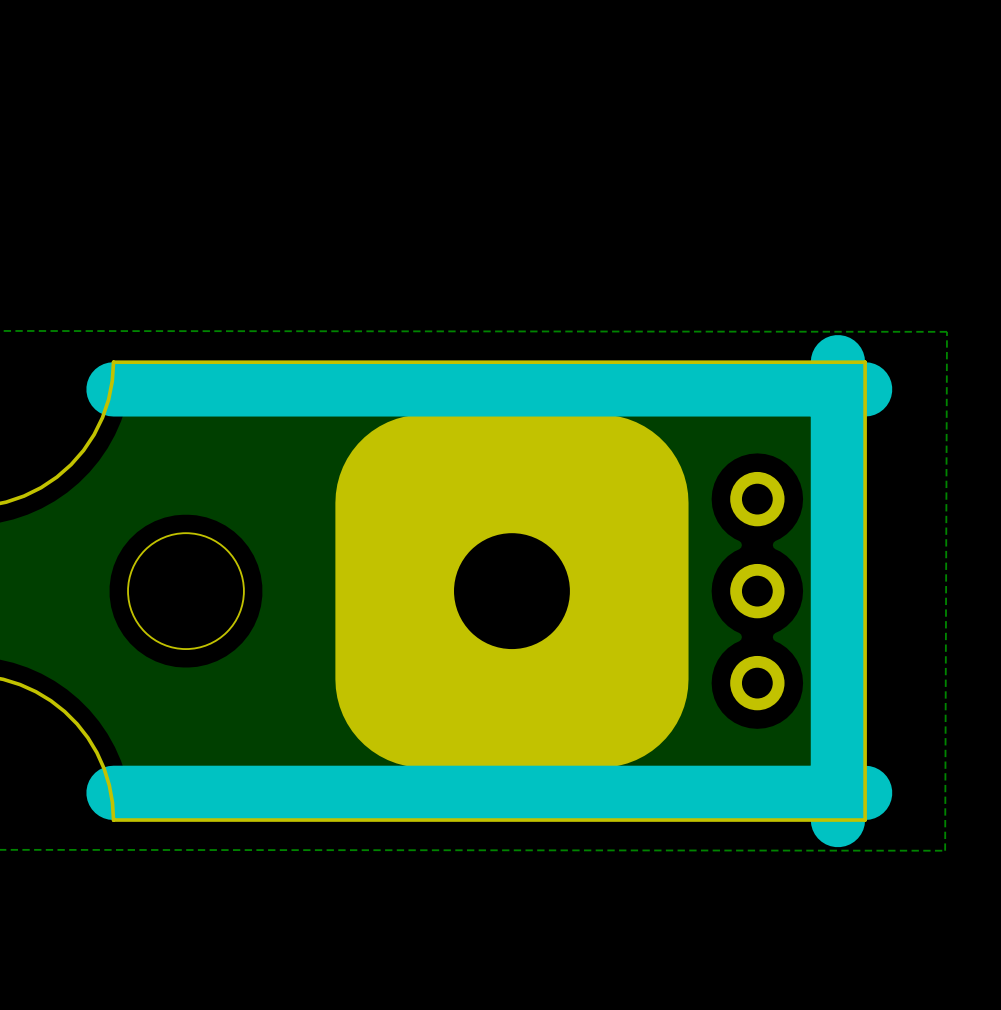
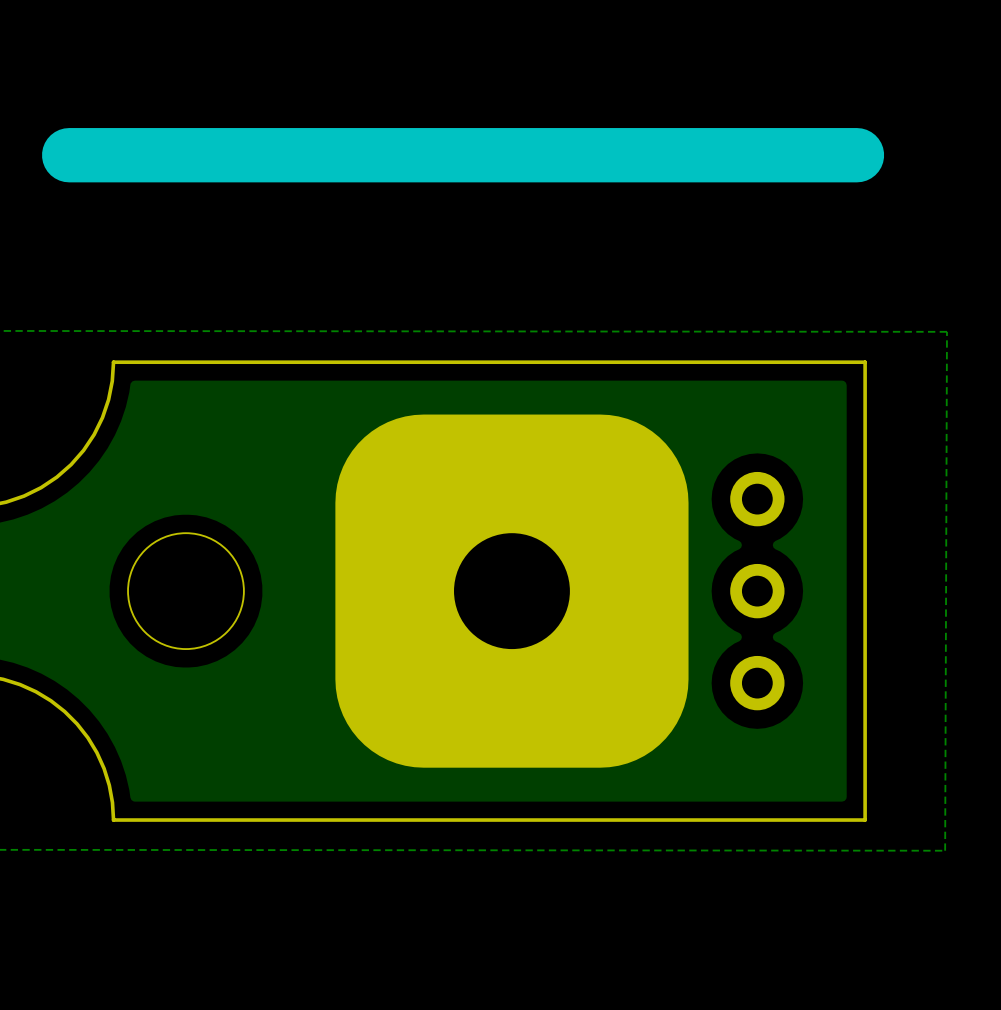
line: none -> (856, 155) (69, 155)
line: (837, 362) (837, 820) -> none
line: (865, 389) (113, 389) -> none
line: (865, 792) (113, 792) -> none

